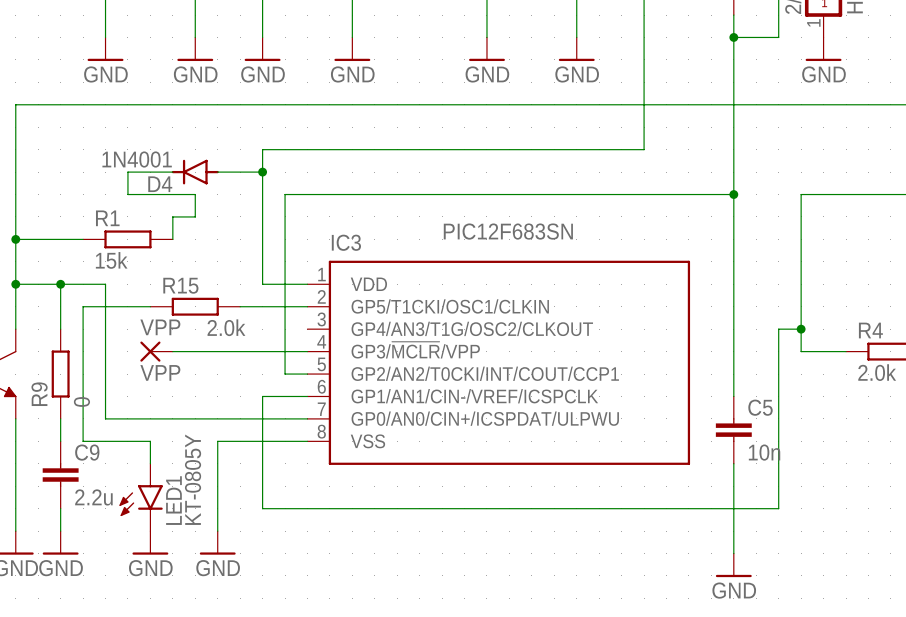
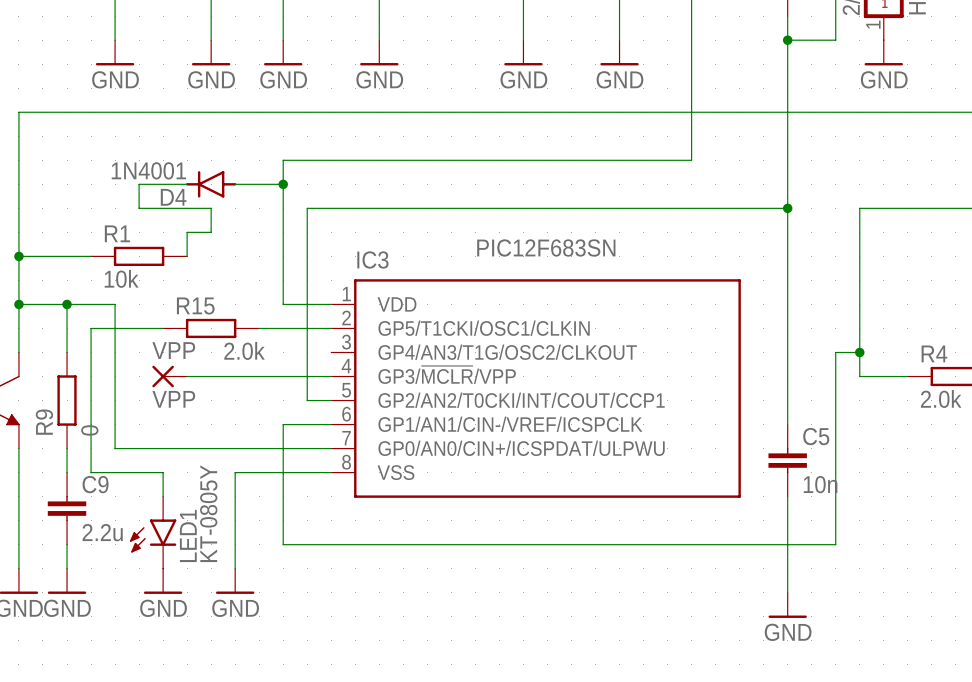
R1 value: 15k (111, 260) -> 10k (121, 278)

